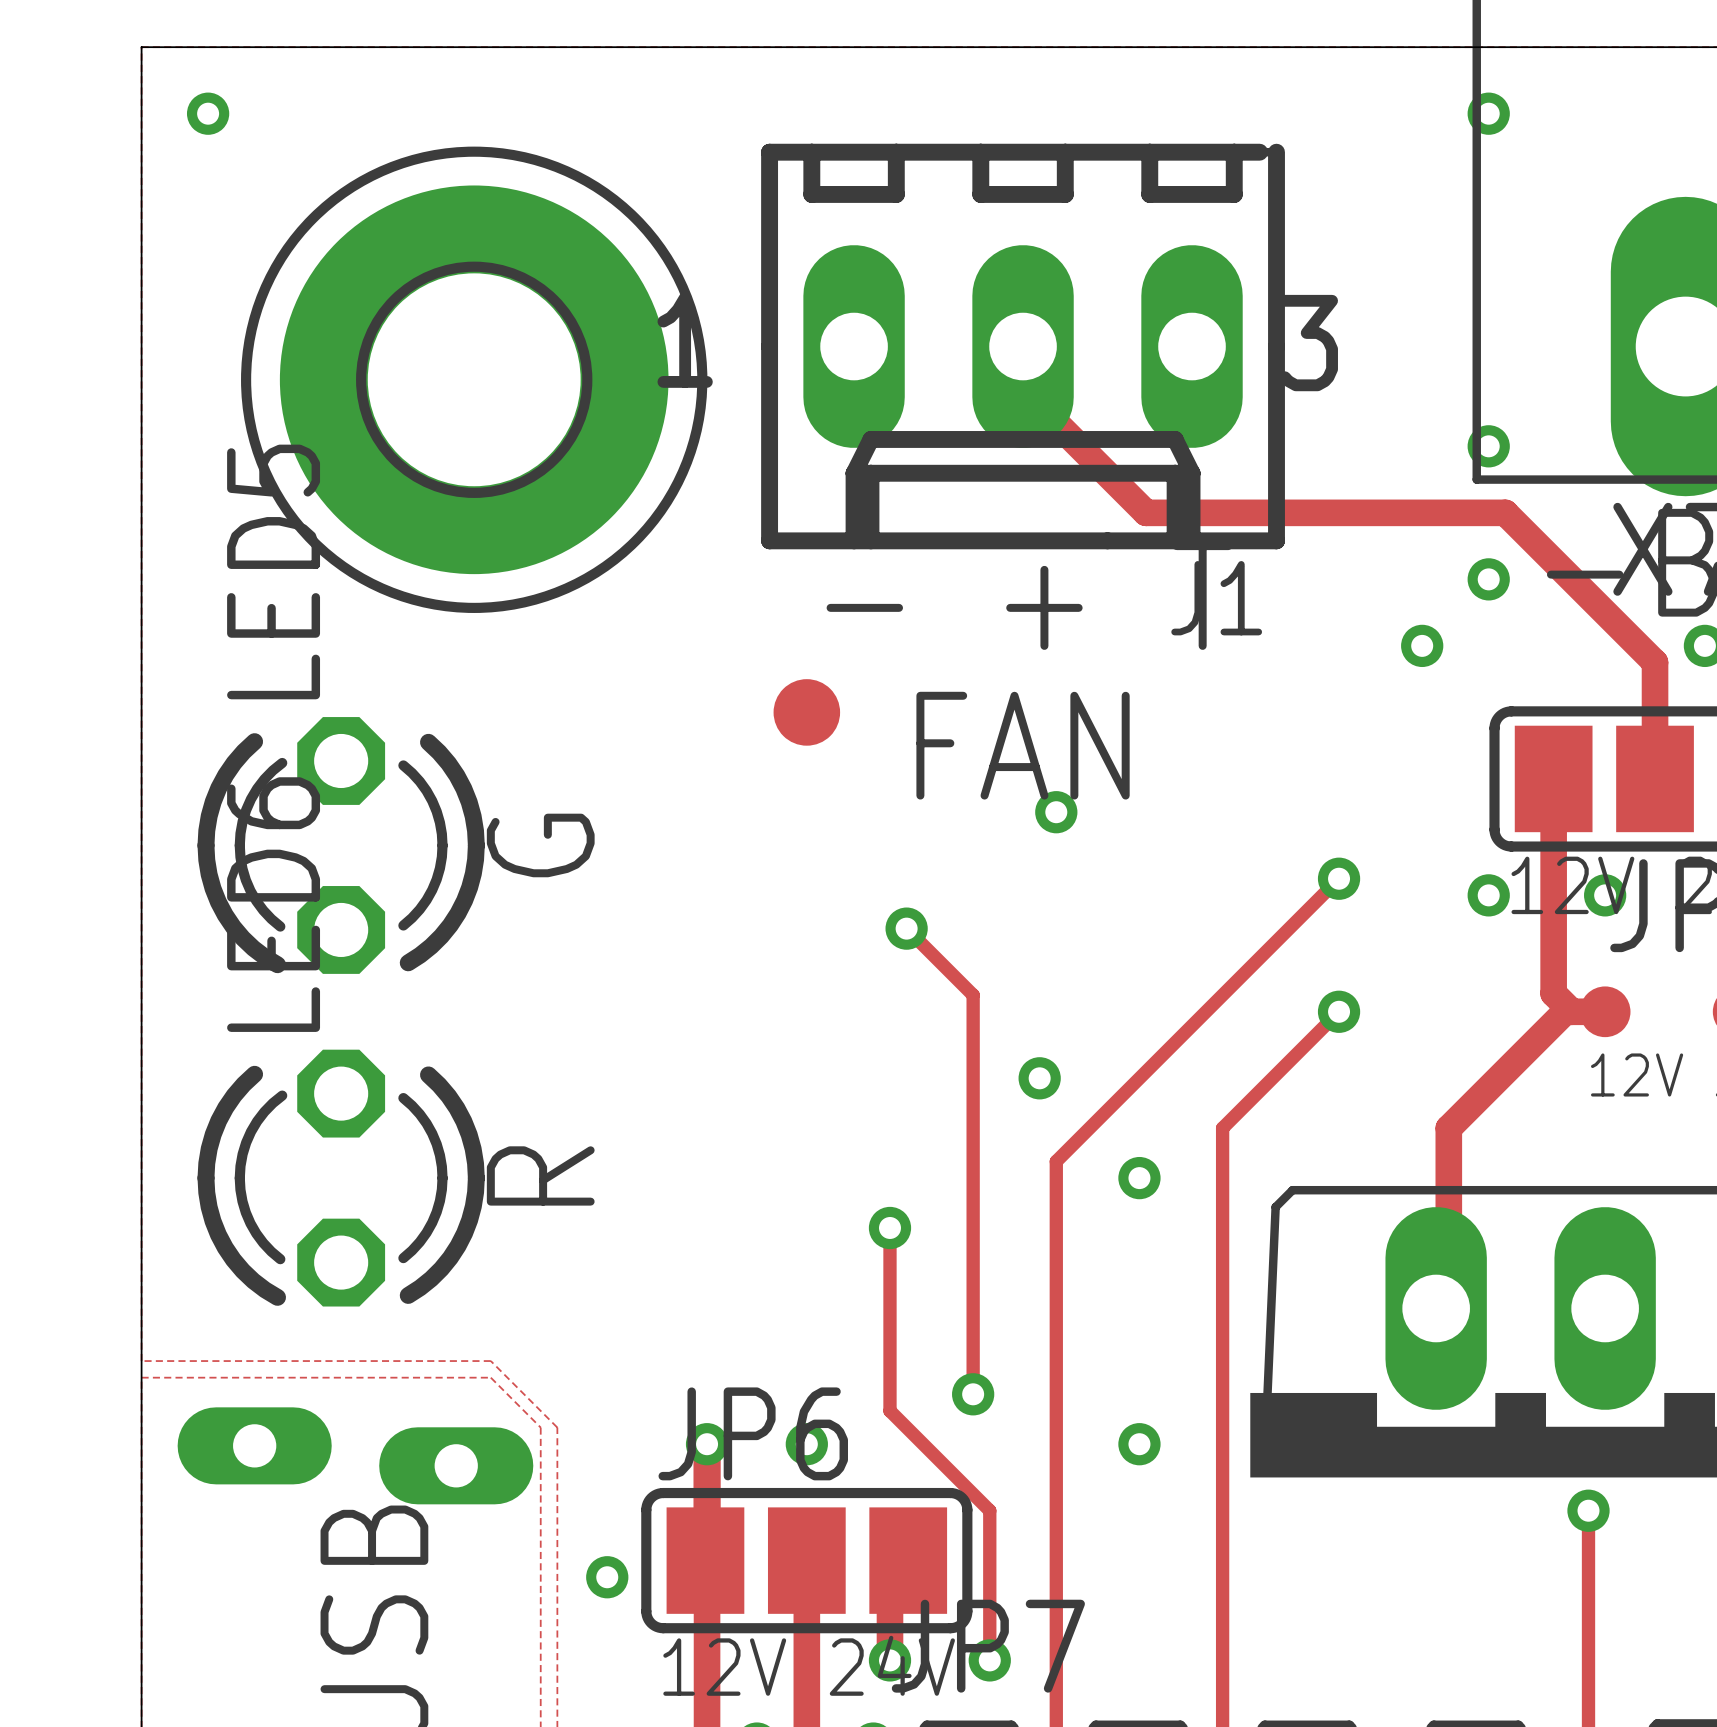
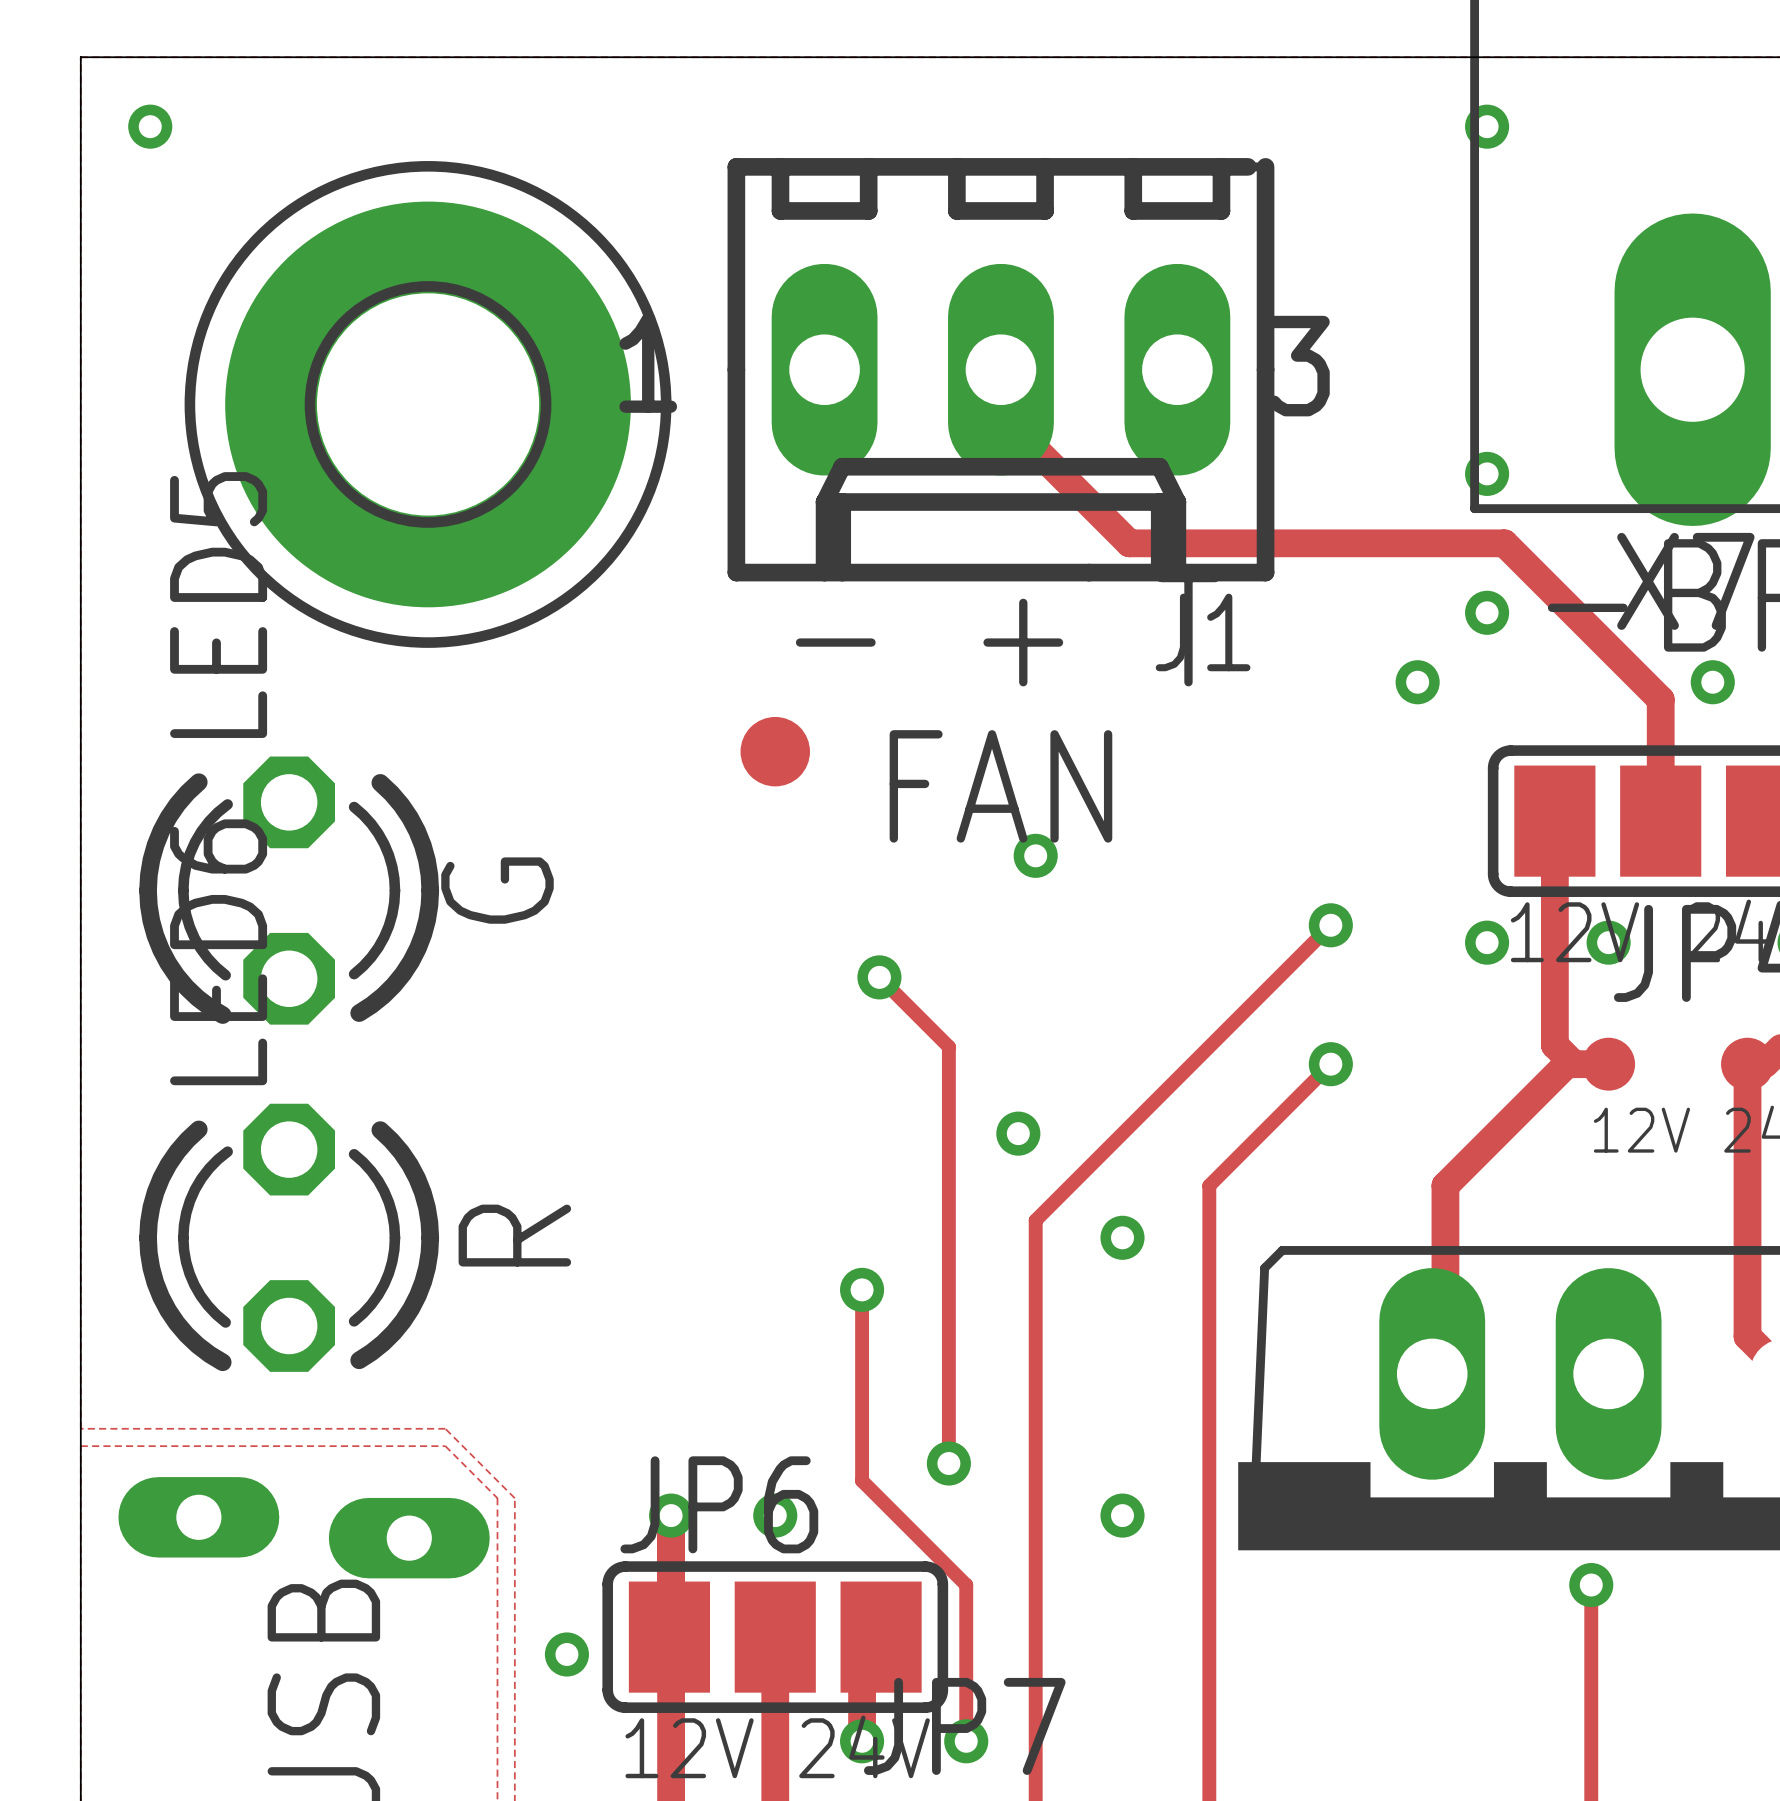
text position: R (540, 1175) -> R (514, 1235)

